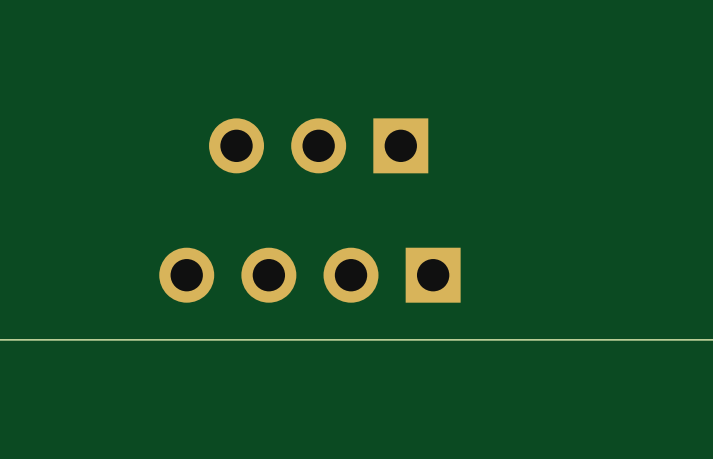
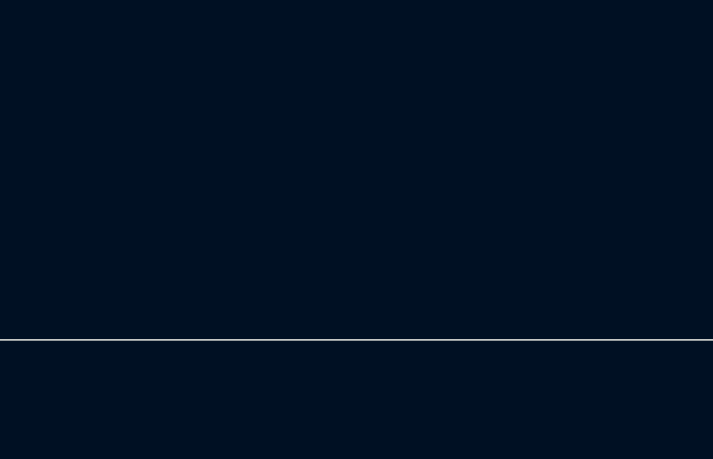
part: (318, 145) -> none
part: (309, 275) -> none

